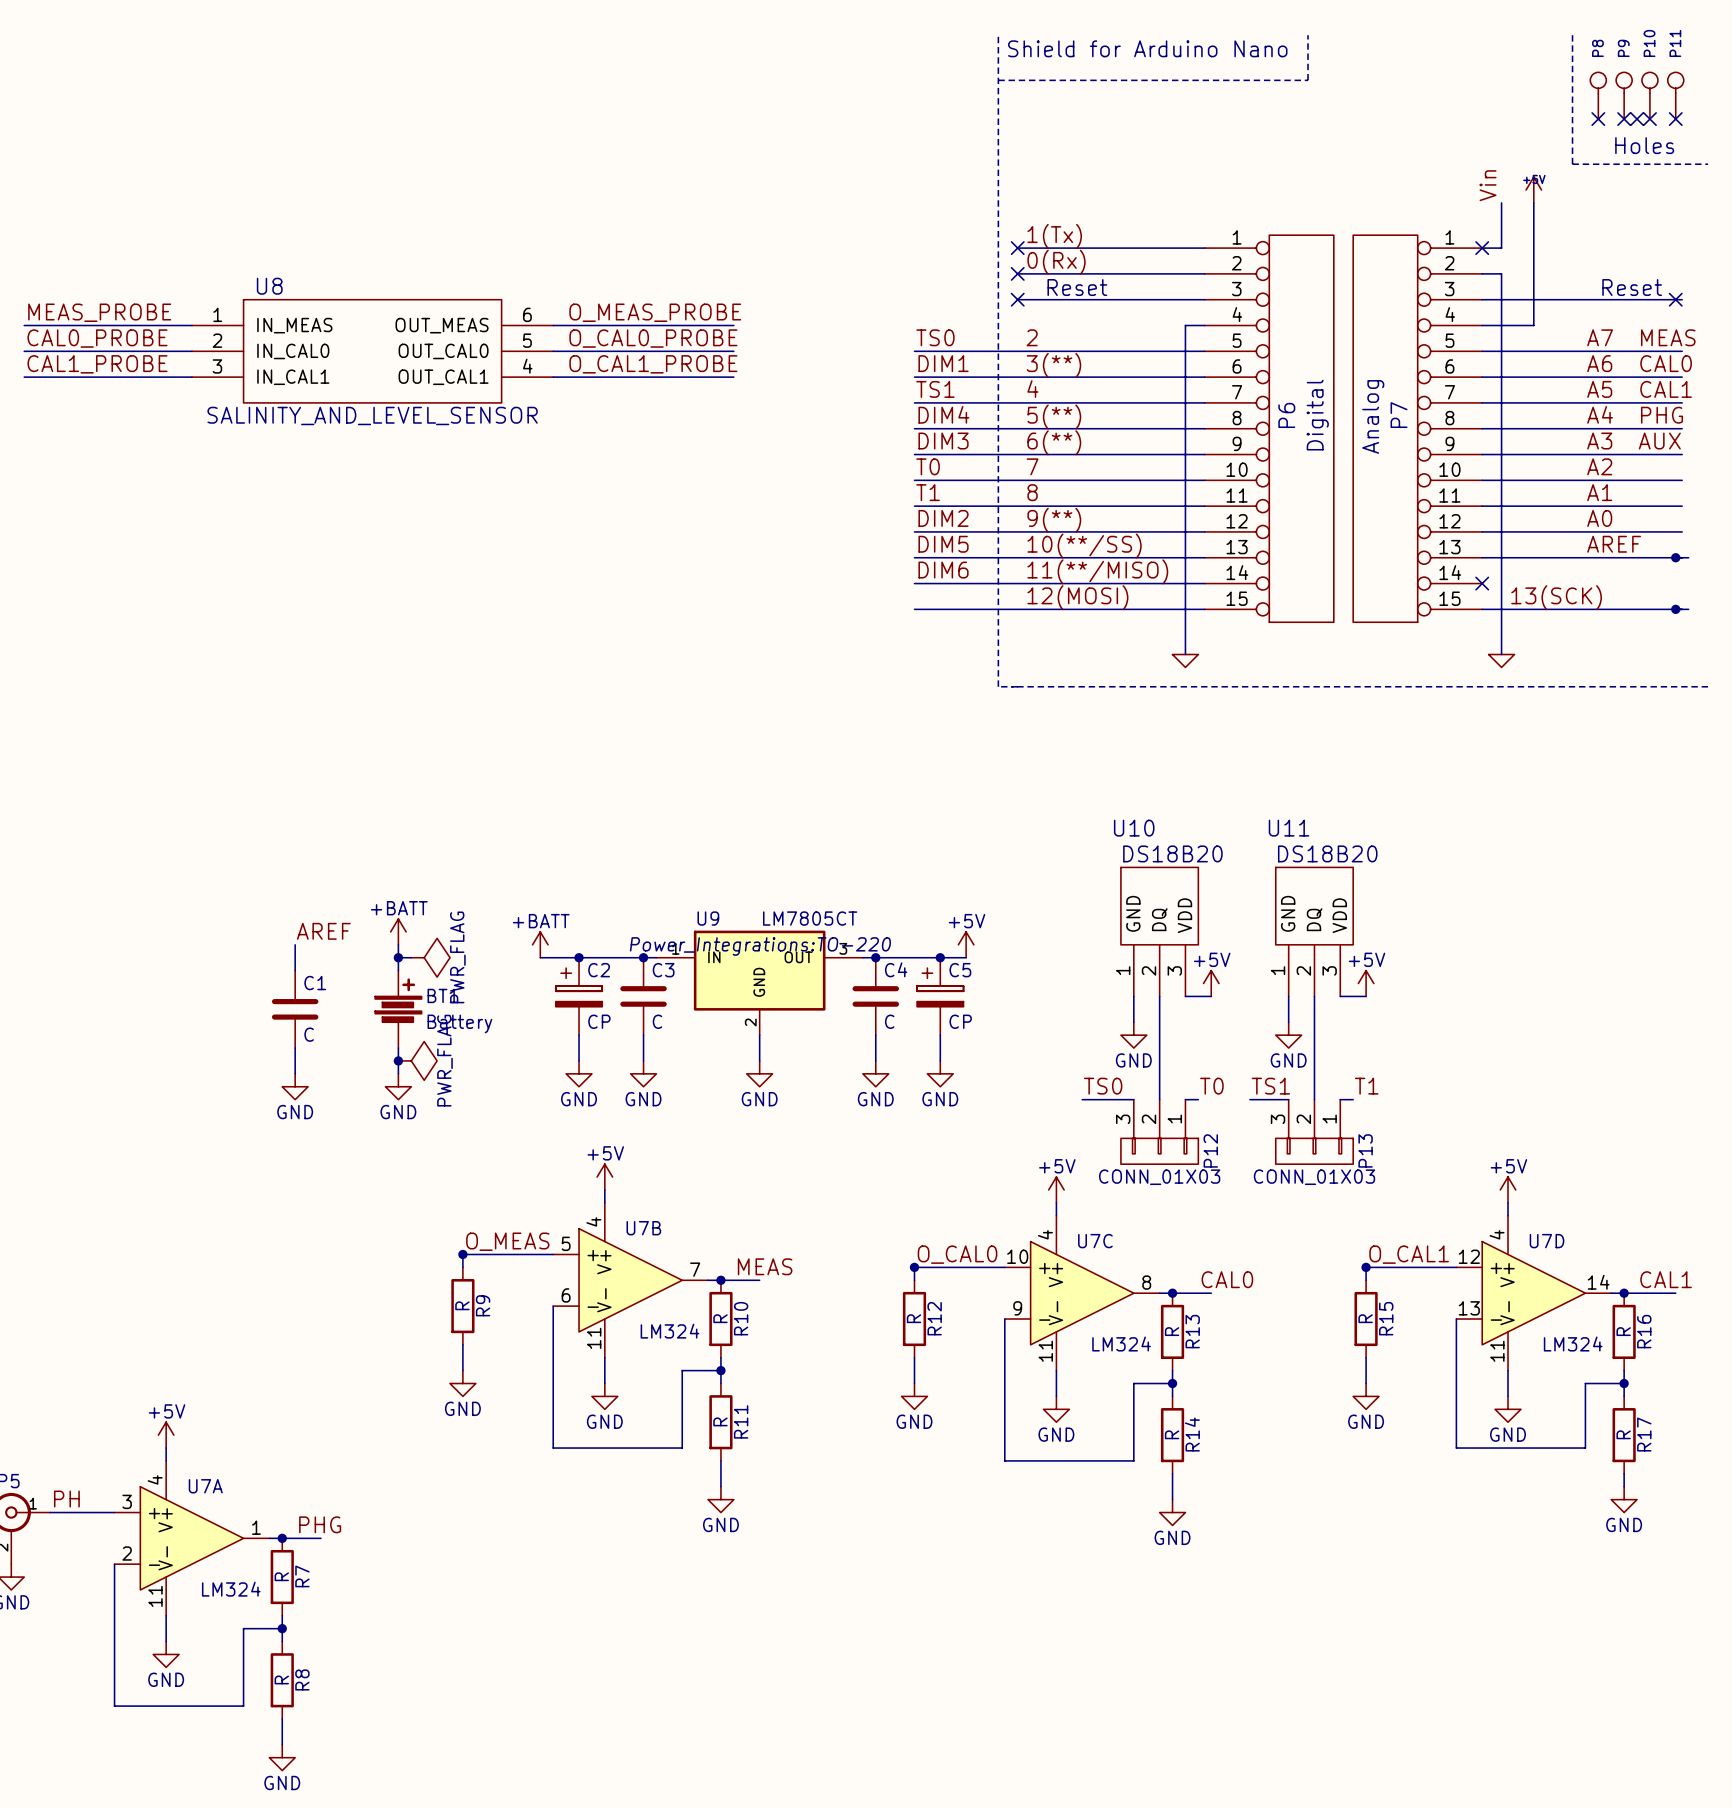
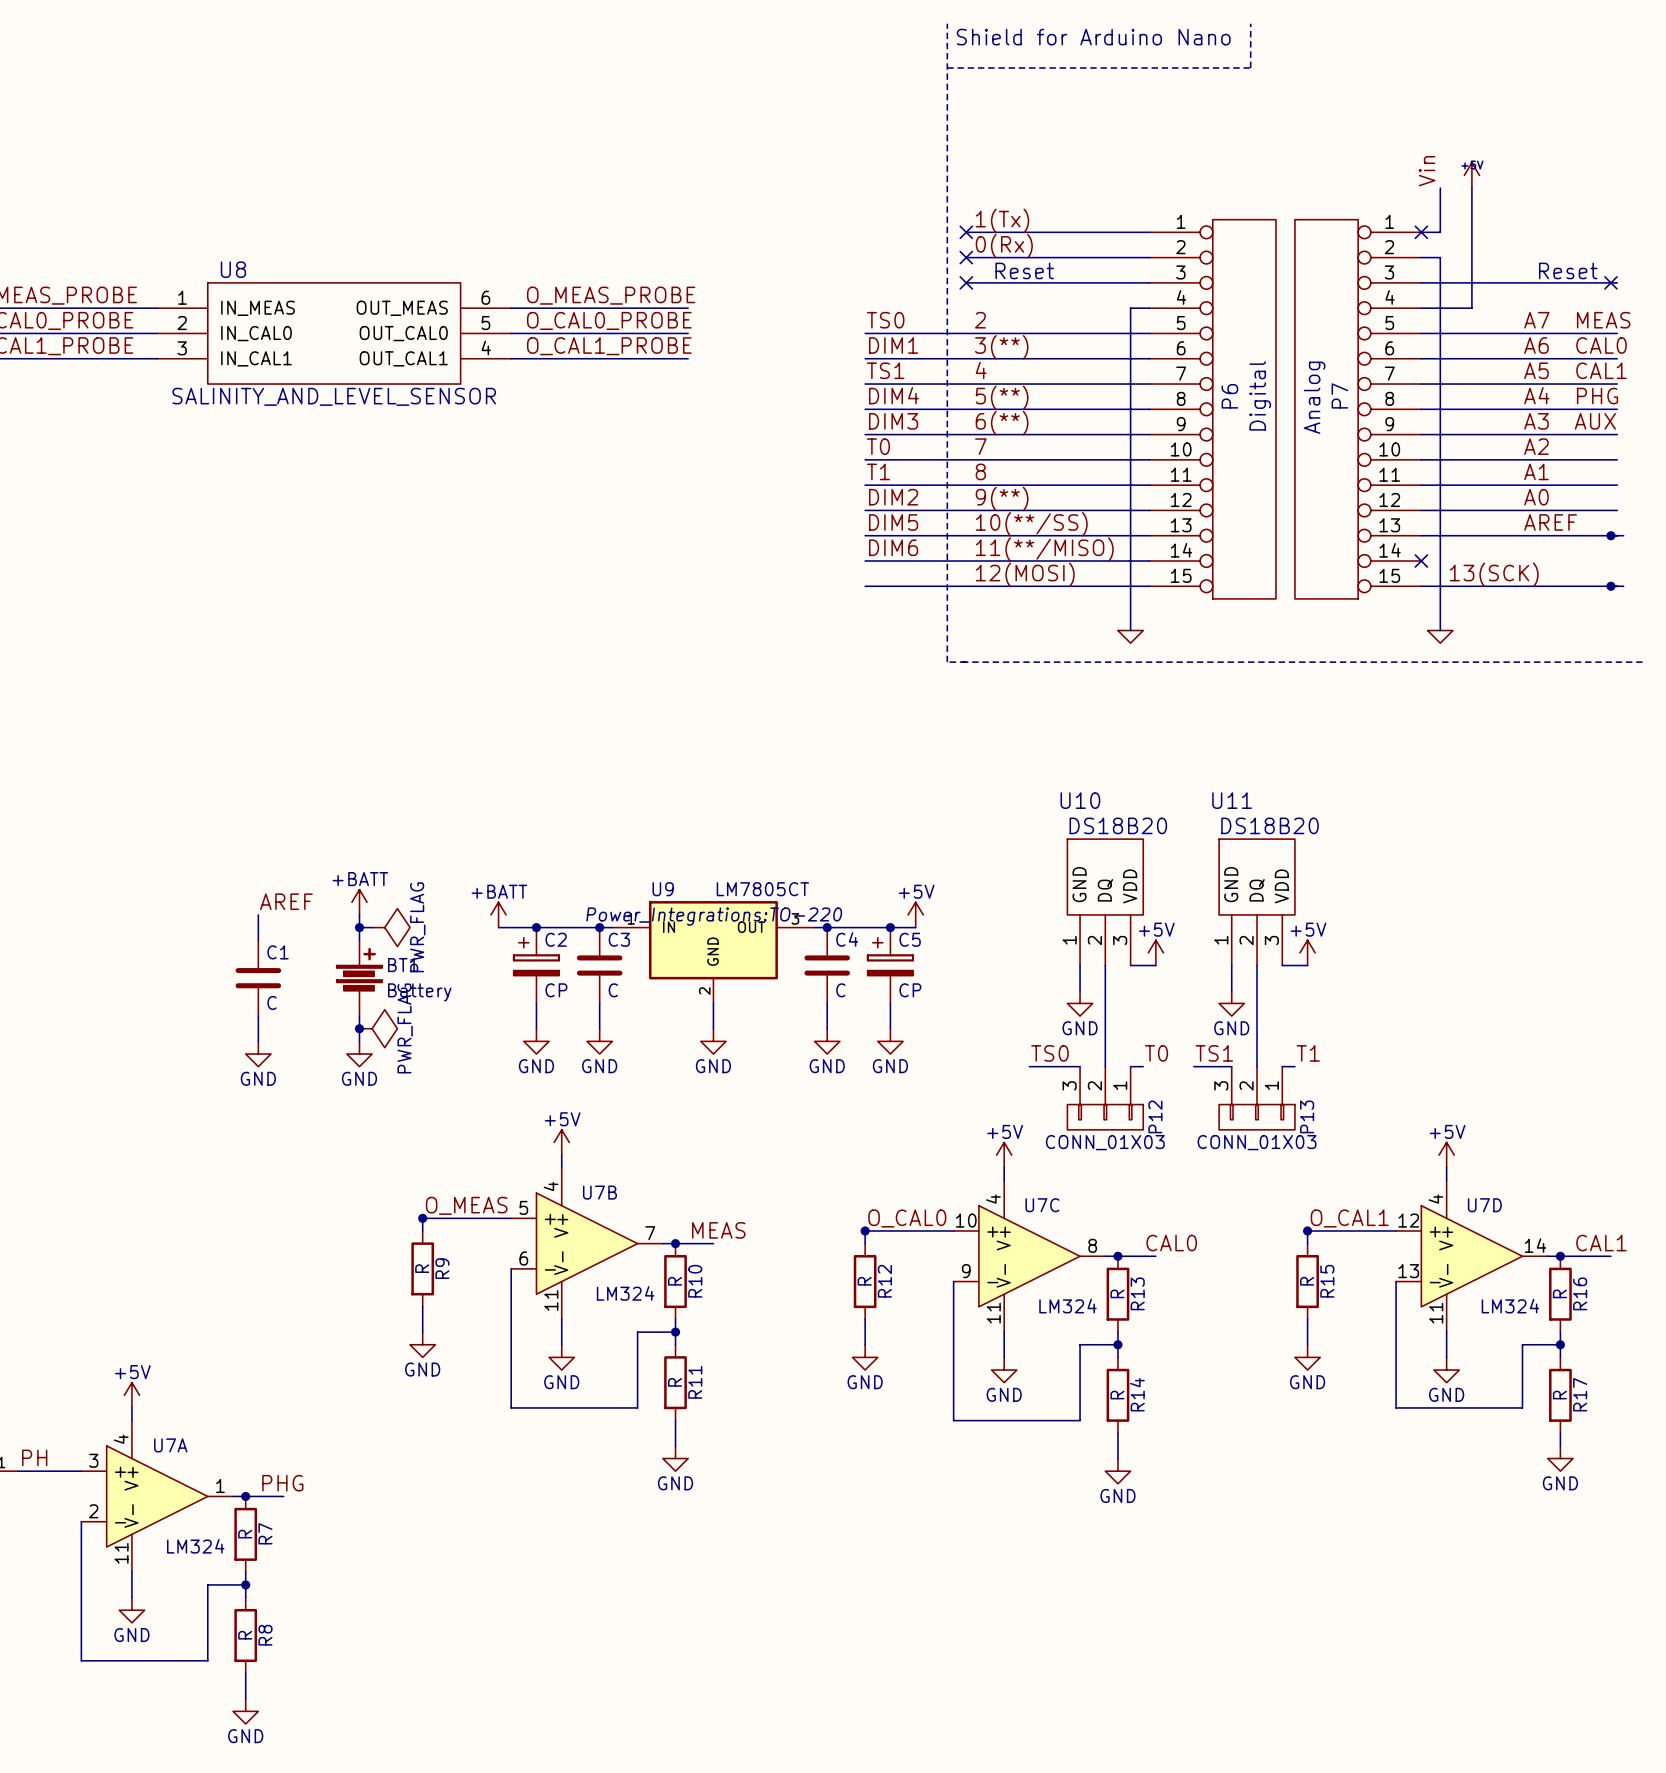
line: (1572, 35) (1572, 164) (1708, 164) -> none
P8: (1598, 95) -> none
P9: (1624, 95) -> none
P10: (1649, 95) -> none
P11: (1675, 95) -> none
no-connect mark: (1598, 119) -> none
no-connect mark: (1624, 119) -> none
no-connect mark: (1637, 119) -> none
no-connect mark: (1649, 119) -> none
no-connect mark: (1675, 119) -> none
text: Holes (1644, 145) -> none

